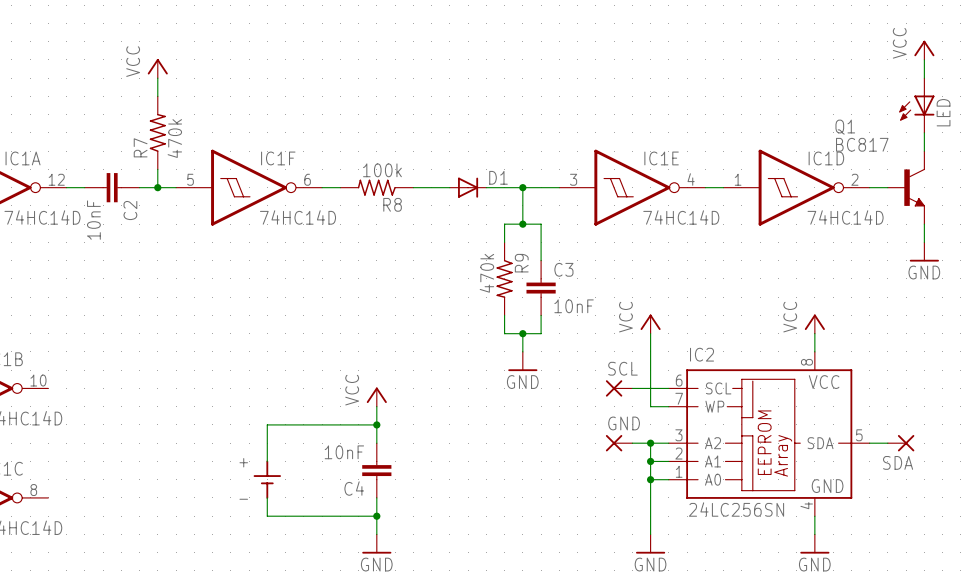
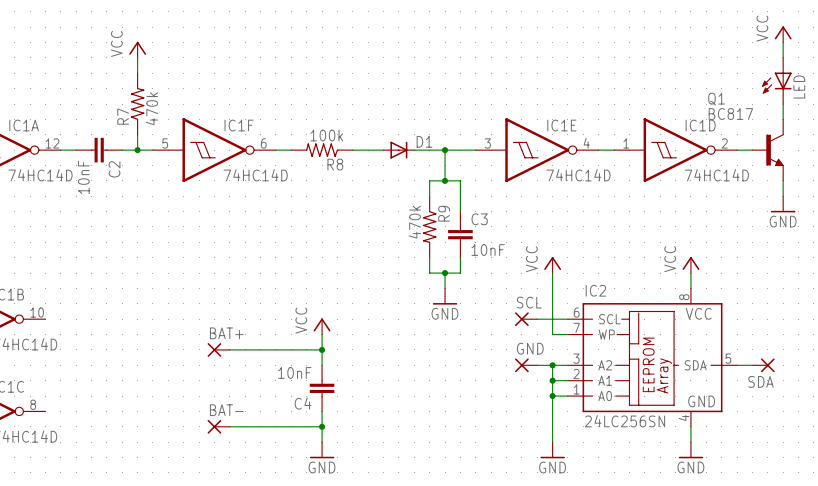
BAT+: none -> (218, 349)
wire: (267, 424) (267, 461) -> none
part: (267, 479) -> none
wire: (267, 497) (267, 516) -> none
BAT-: none -> (218, 426)

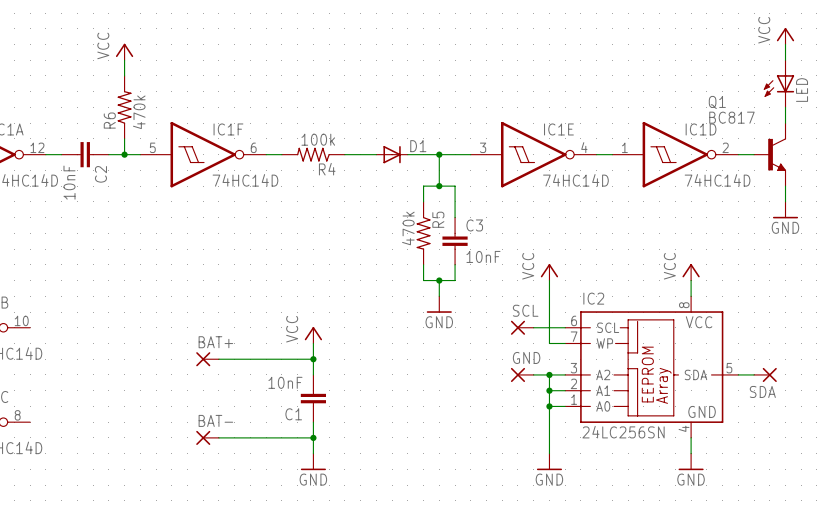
R7 name: R7 (123, 116) -> R6 (109, 120)
R8 name: R8 (335, 164) -> R4 (327, 169)
R9 name: R9 (444, 213) -> R5 (438, 219)
C4 name: C4 (303, 403) -> C1 (293, 414)

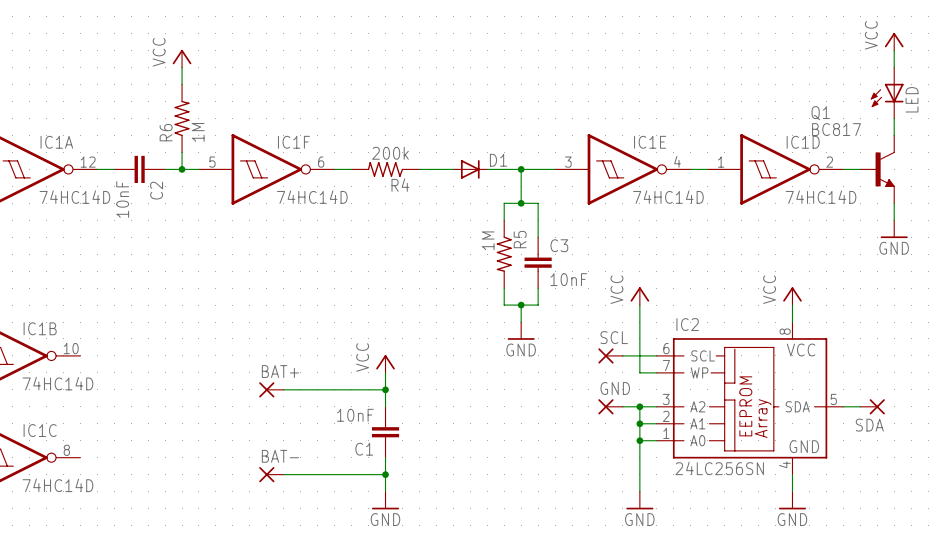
R6 value: 470k (139, 112) -> 1M (198, 132)
R4 value: 100k (318, 139) -> 200k (390, 153)
R5 value: 470k (408, 228) -> 1M (488, 240)

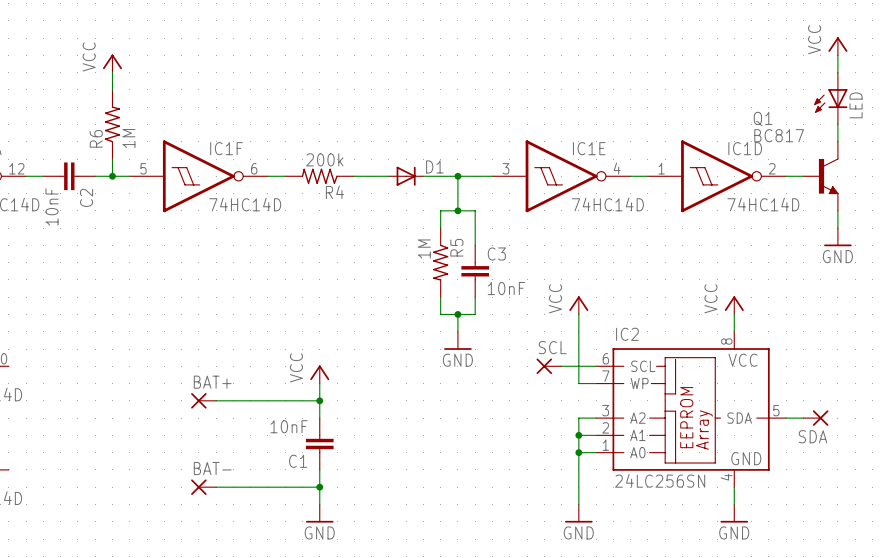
GND: (610, 406) -> none
wire: (622, 406) (639, 406) -> none
junction: (639, 406) -> none

